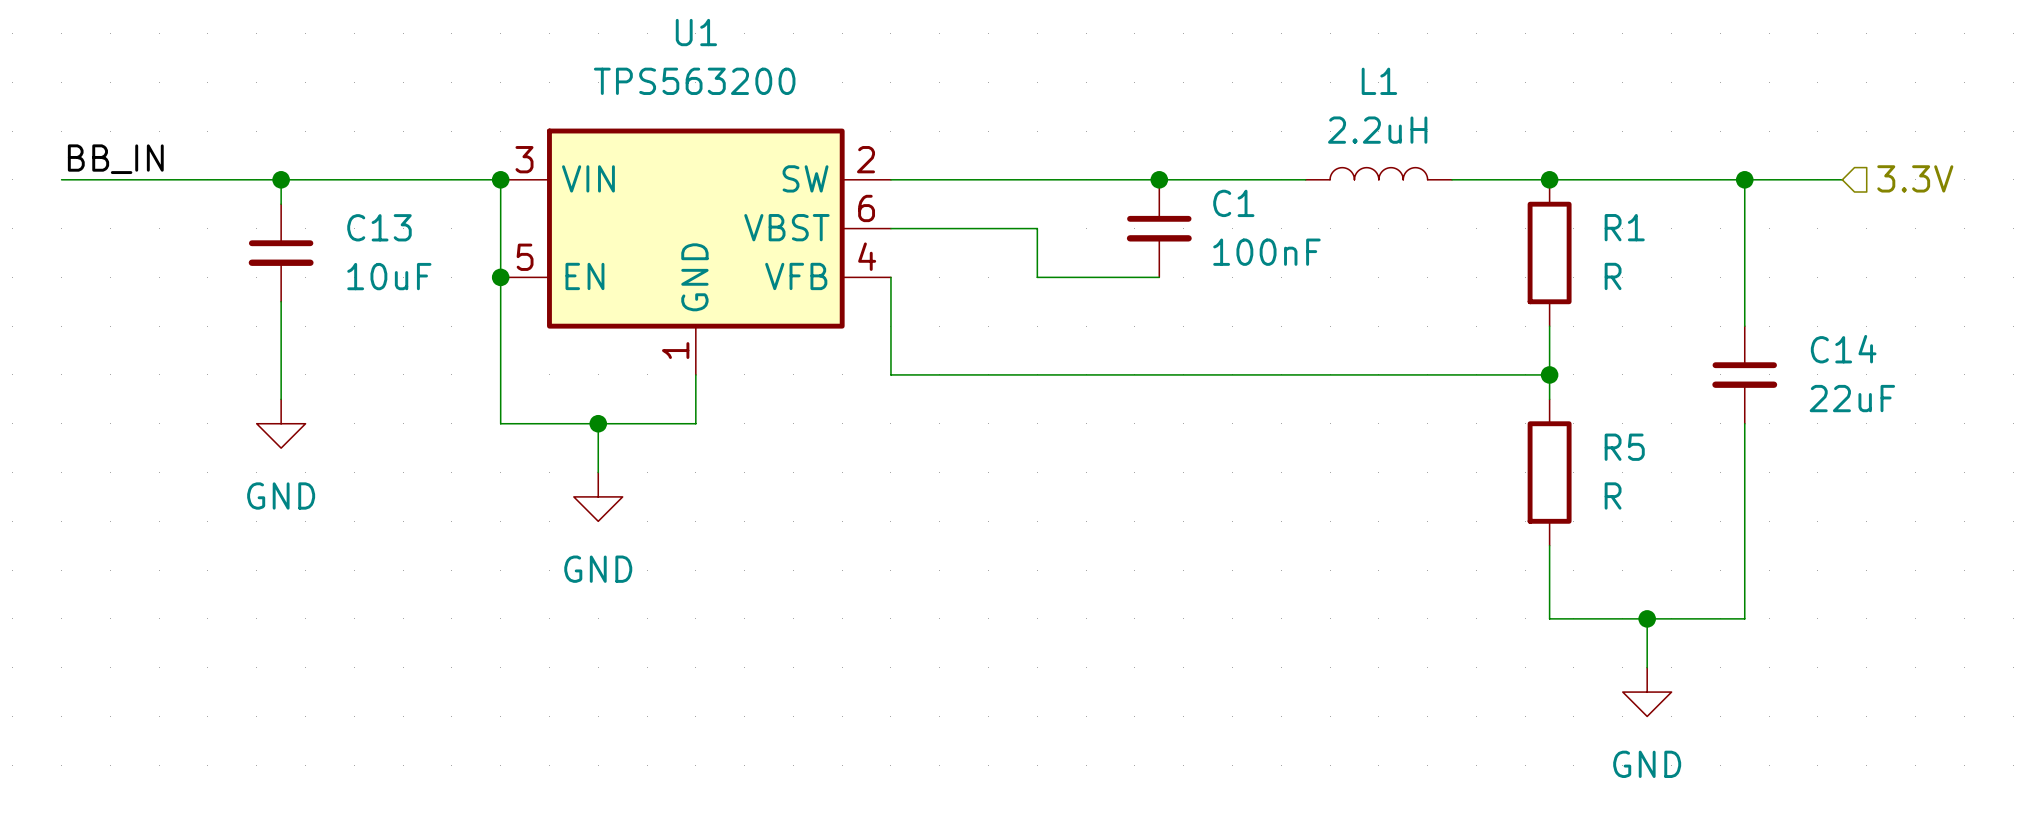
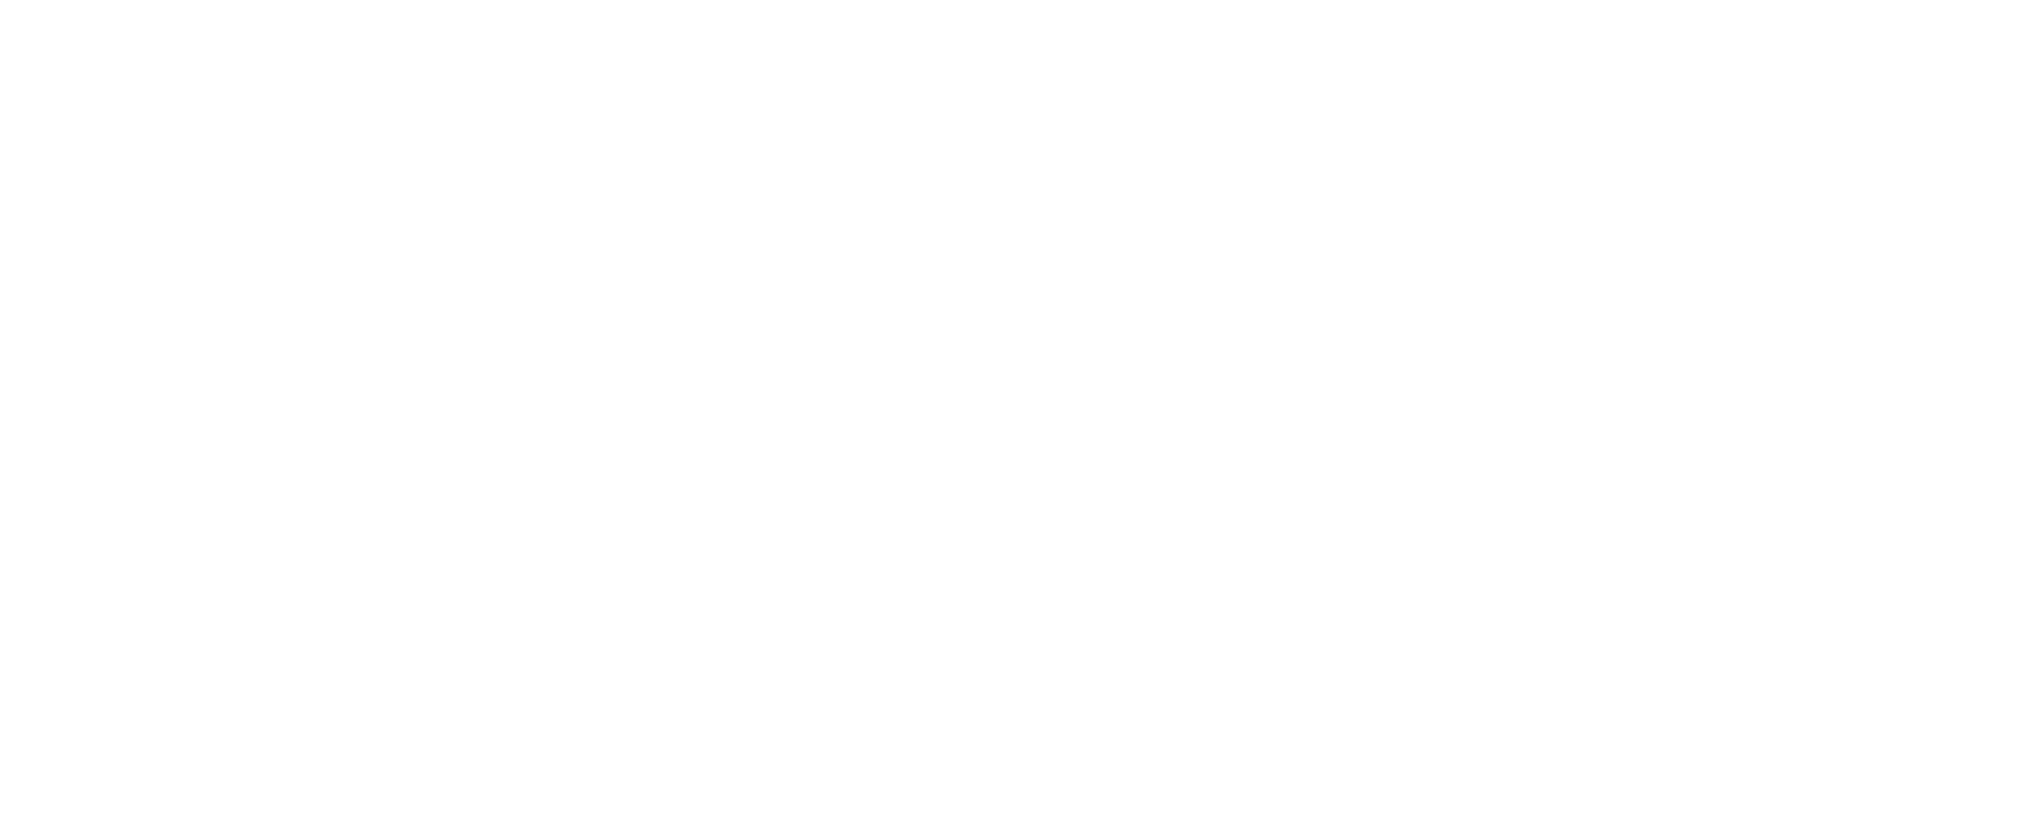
label: BB_IN (115, 159) -> none
L1: 2.2uH (1378, 173) -> none
hierarchical label: 3.3V (1915, 178) -> none
wire: (61, 179) (500, 179) (500, 423) (695, 423) (695, 374) -> none
wire: (281, 179) (281, 204) -> none
junction: (281, 179) -> none
junction: (500, 179) -> none
wire: (890, 179) (1305, 179) -> none
junction: (1159, 179) -> none
wire: (1452, 179) (1842, 179) -> none
junction: (1549, 179) -> none
wire: (1744, 179) (1744, 326) -> none
junction: (1744, 179) -> none
wire: (890, 228) (1037, 228) (1037, 277) (1159, 277) -> none
C1: 100nF (1159, 228) -> none
U1: TPS563200 (695, 251) -> none
C13: 10uF (281, 252) -> none
R1: R (1549, 252) -> none
junction: (500, 277) -> none
wire: (890, 277) (890, 374) (1549, 374) -> none
wire: (281, 301) (281, 399) -> none
wire: (1549, 326) (1549, 399) -> none
junction: (1549, 374) -> none
C14: 22uF (1744, 374) -> none
power symbol: GND (281, 423) -> none
wire: (598, 423) (598, 472) -> none
junction: (598, 423) -> none
wire: (1744, 423) (1744, 618) (1549, 618) (1549, 545) -> none
R5: R (1549, 472) -> none
power symbol: GND (598, 496) -> none
wire: (1647, 618) (1647, 667) -> none
junction: (1647, 618) -> none
power symbol: GND (1647, 692) -> none

